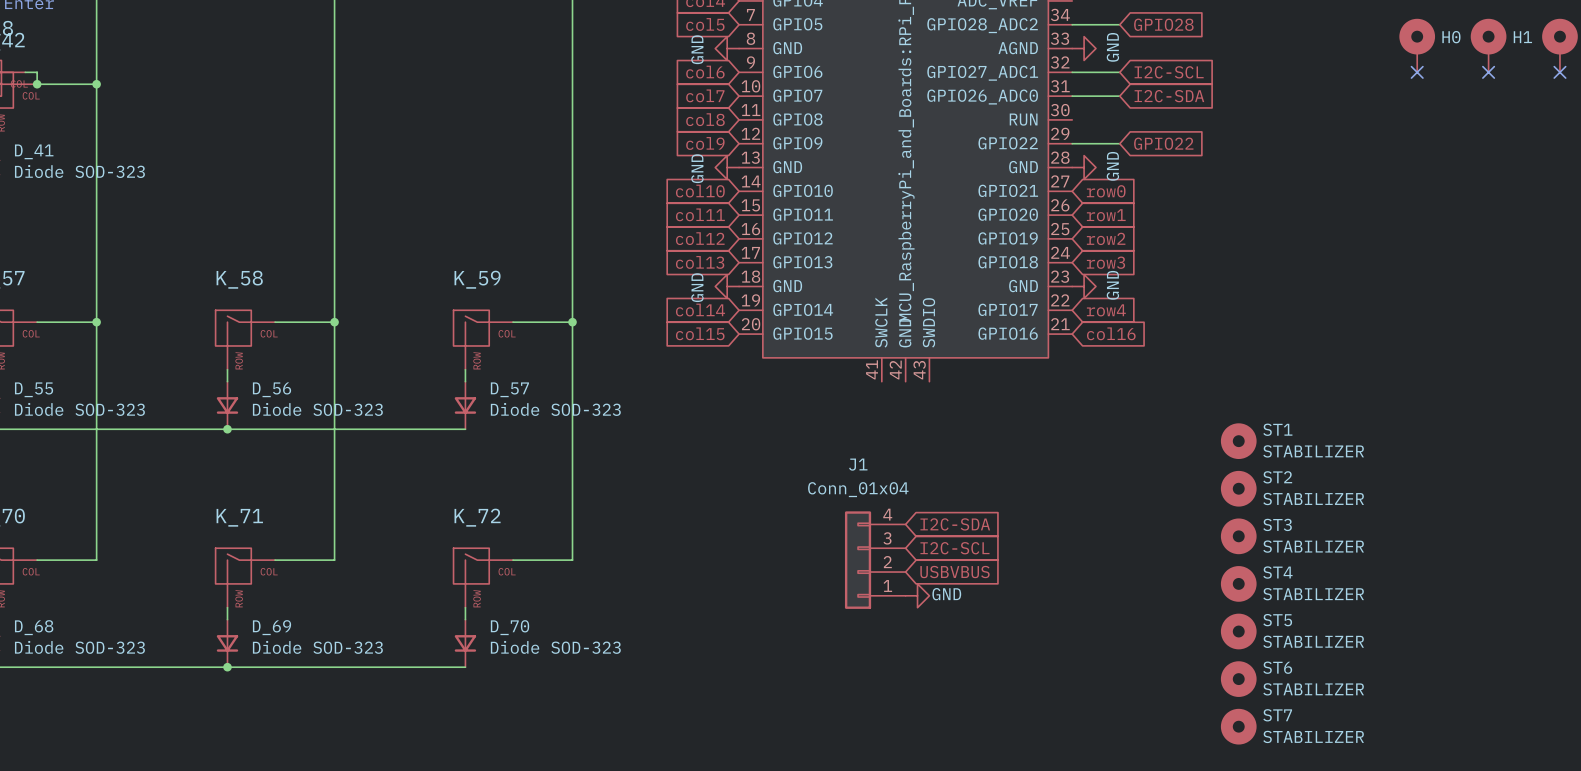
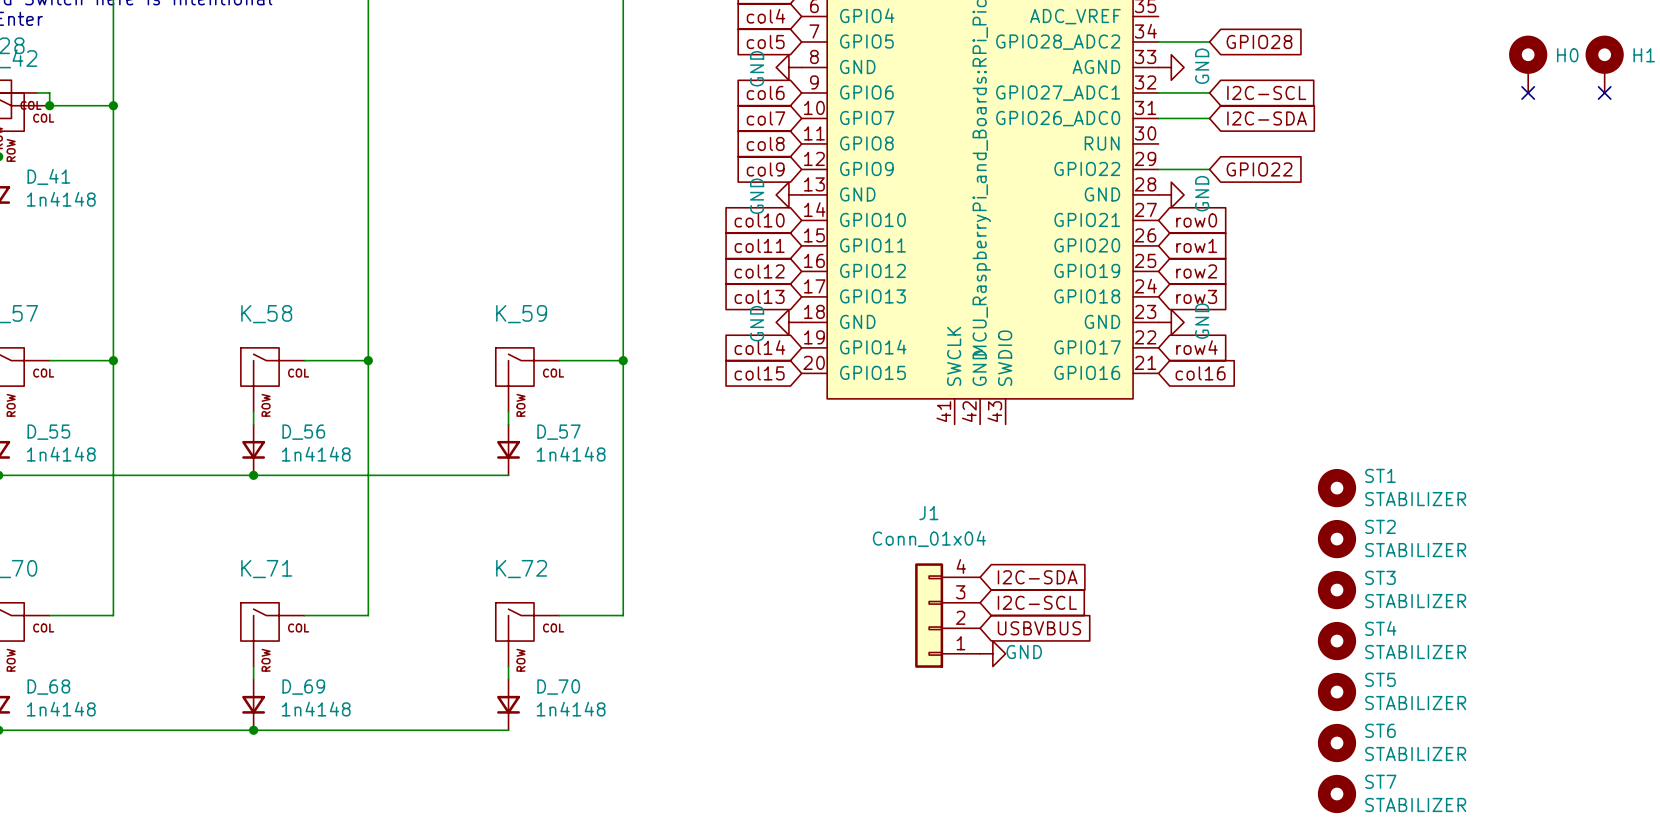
D_41 value: Diode SOD-323 (79, 171) -> 1n4148 (61, 199)
D_55 value: Diode SOD-323 (79, 409) -> 1n4148 (61, 454)
D_56 value: Diode SOD-323 (317, 409) -> 1n4148 (316, 454)
D_57 value: Diode SOD-323 (555, 409) -> 1n4148 (571, 454)
D_68 value: Diode SOD-323 (79, 647) -> 1n4148 (61, 709)
D_69 value: Diode SOD-323 (317, 647) -> 1n4148 (316, 709)
D_70 value: Diode SOD-323 (555, 647) -> 1n4148 (571, 709)

